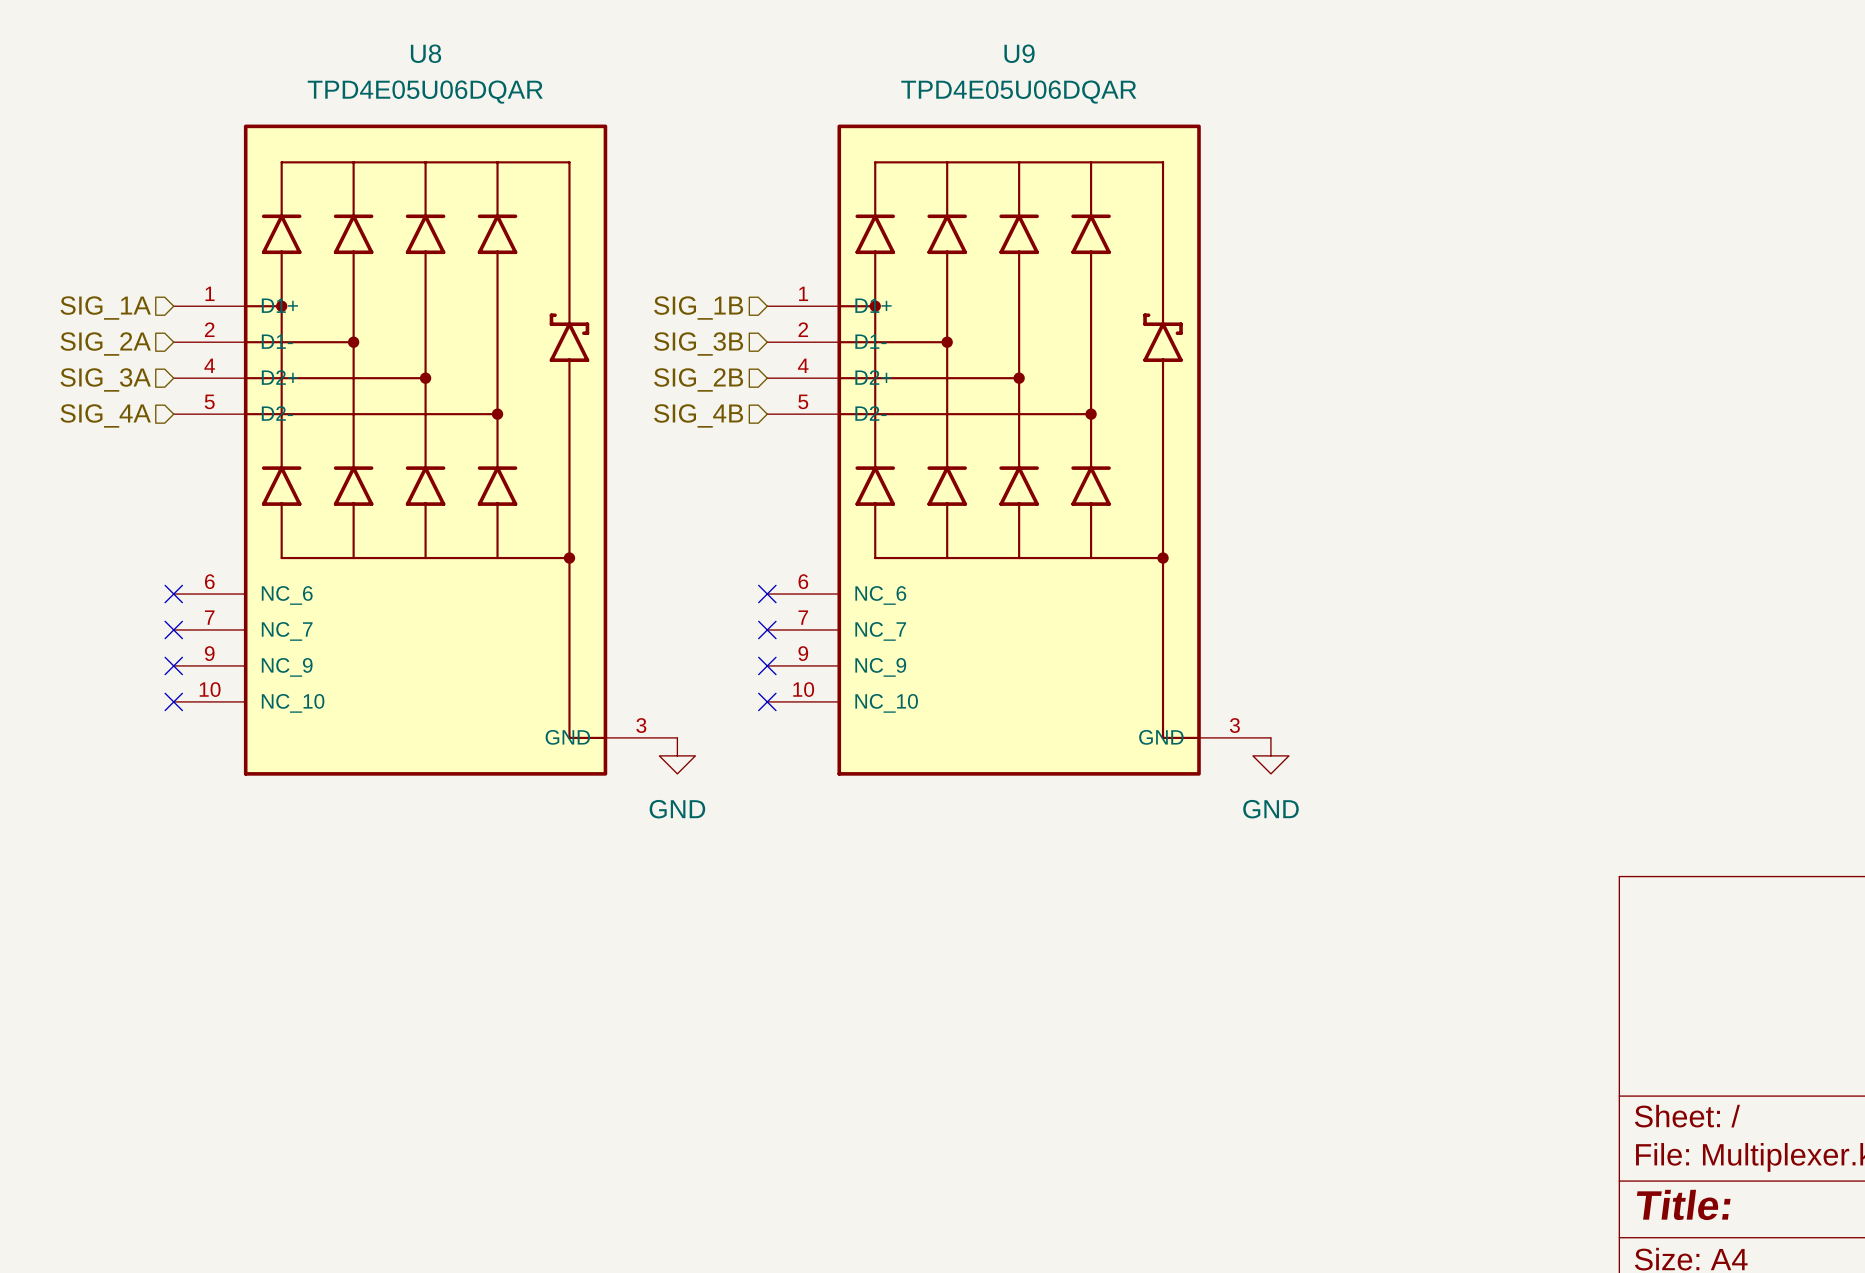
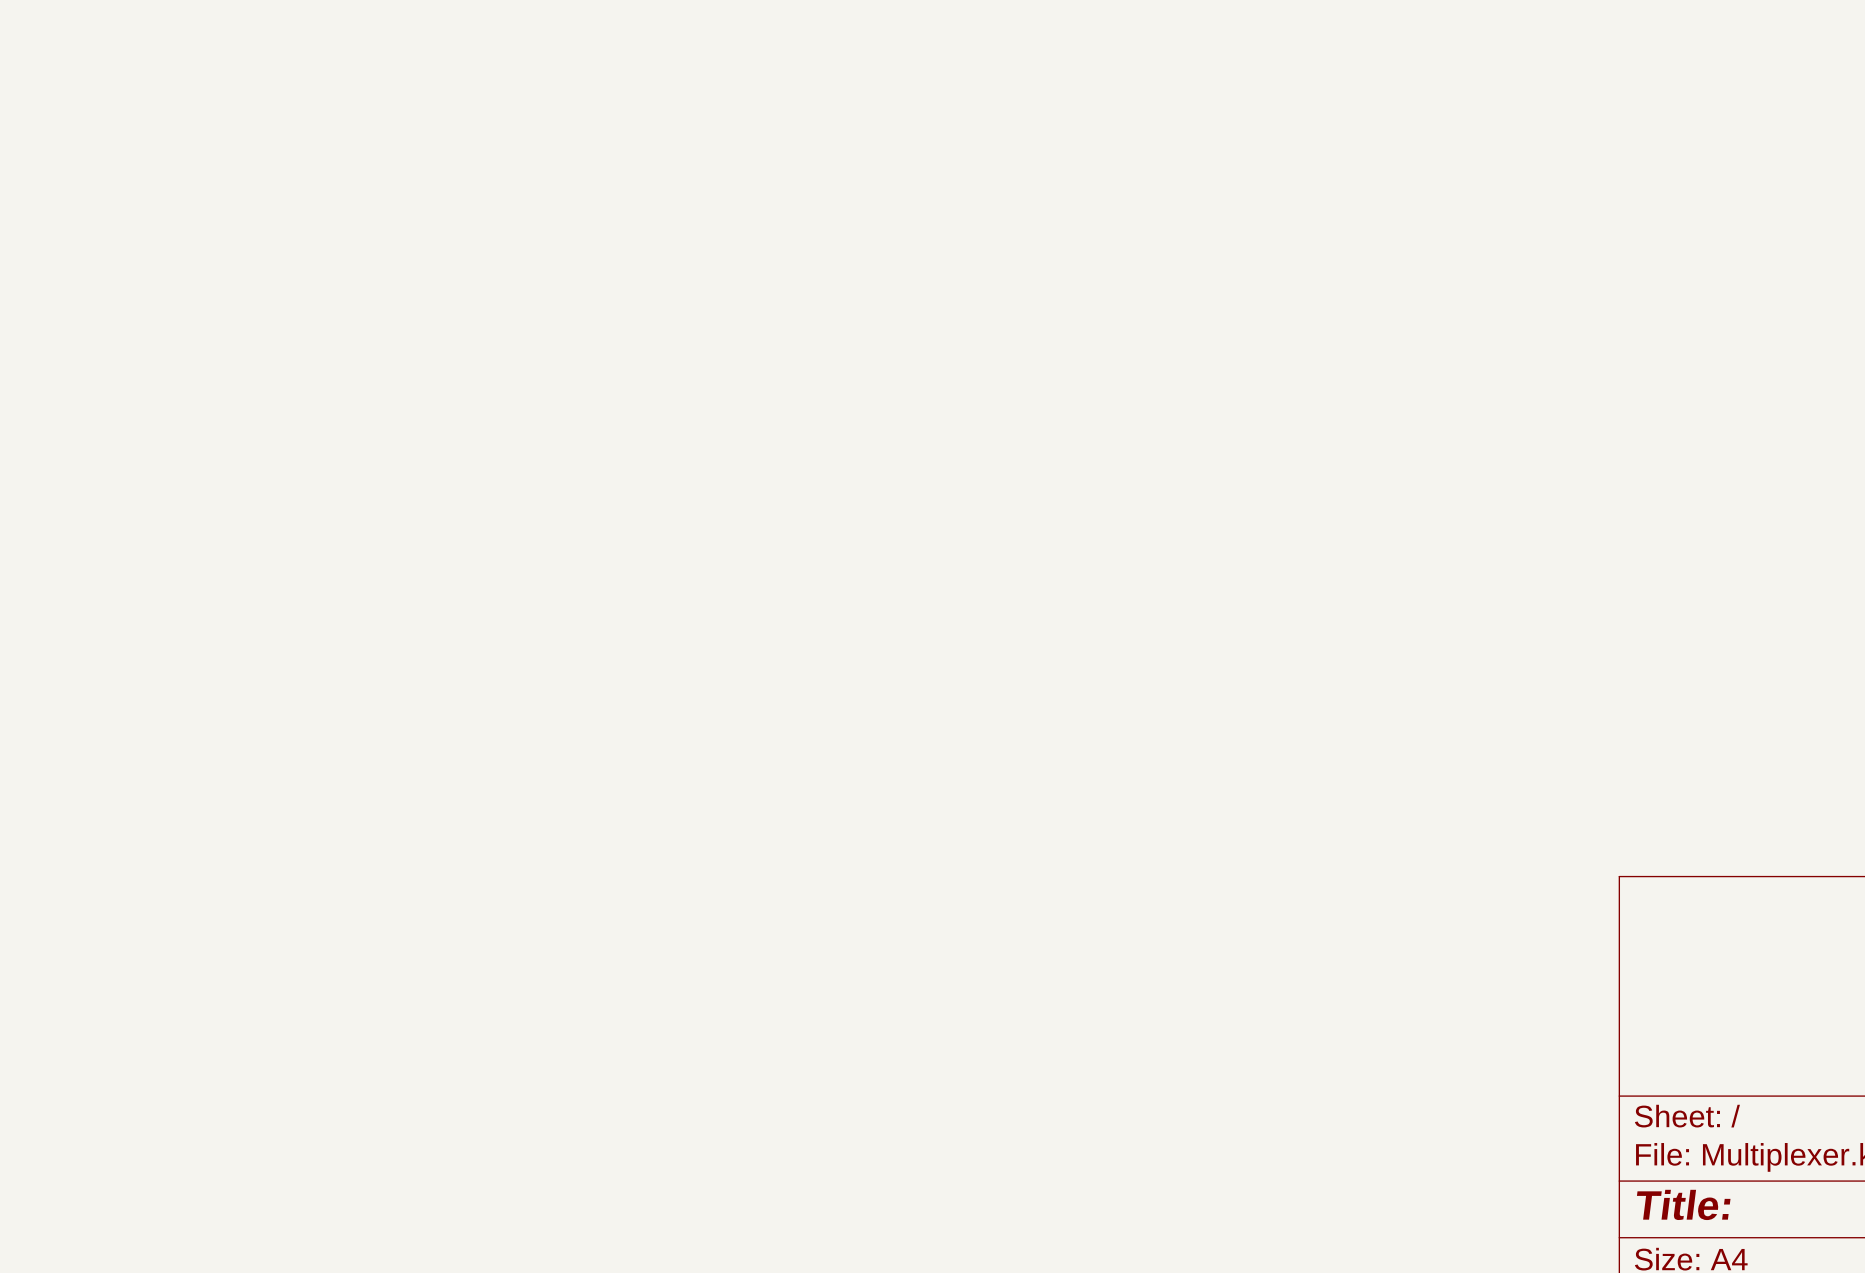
hierarchical label: SIG_1A (105, 308) -> none
hierarchical label: SIG_1B (698, 308) -> none
hierarchical label: SIG_2A (105, 343) -> none
hierarchical label: SIG_3B (698, 343) -> none
hierarchical label: SIG_3A (105, 379) -> none
hierarchical label: SIG_2B (698, 379) -> none
hierarchical label: SIG_4A (105, 415) -> none
hierarchical label: SIG_4B (698, 415) -> none
U8: TPD4E05U06DQAR (425, 450) -> none
U9: TPD4E05U06DQAR (1019, 450) -> none
no-connect mark: (173, 594) -> none
no-connect mark: (767, 594) -> none
no-connect mark: (173, 629) -> none
no-connect mark: (767, 629) -> none
no-connect mark: (173, 665) -> none
no-connect mark: (767, 665) -> none
no-connect mark: (173, 701) -> none
no-connect mark: (767, 701) -> none
power symbol: GND (677, 755) -> none
power symbol: GND (1270, 755) -> none

